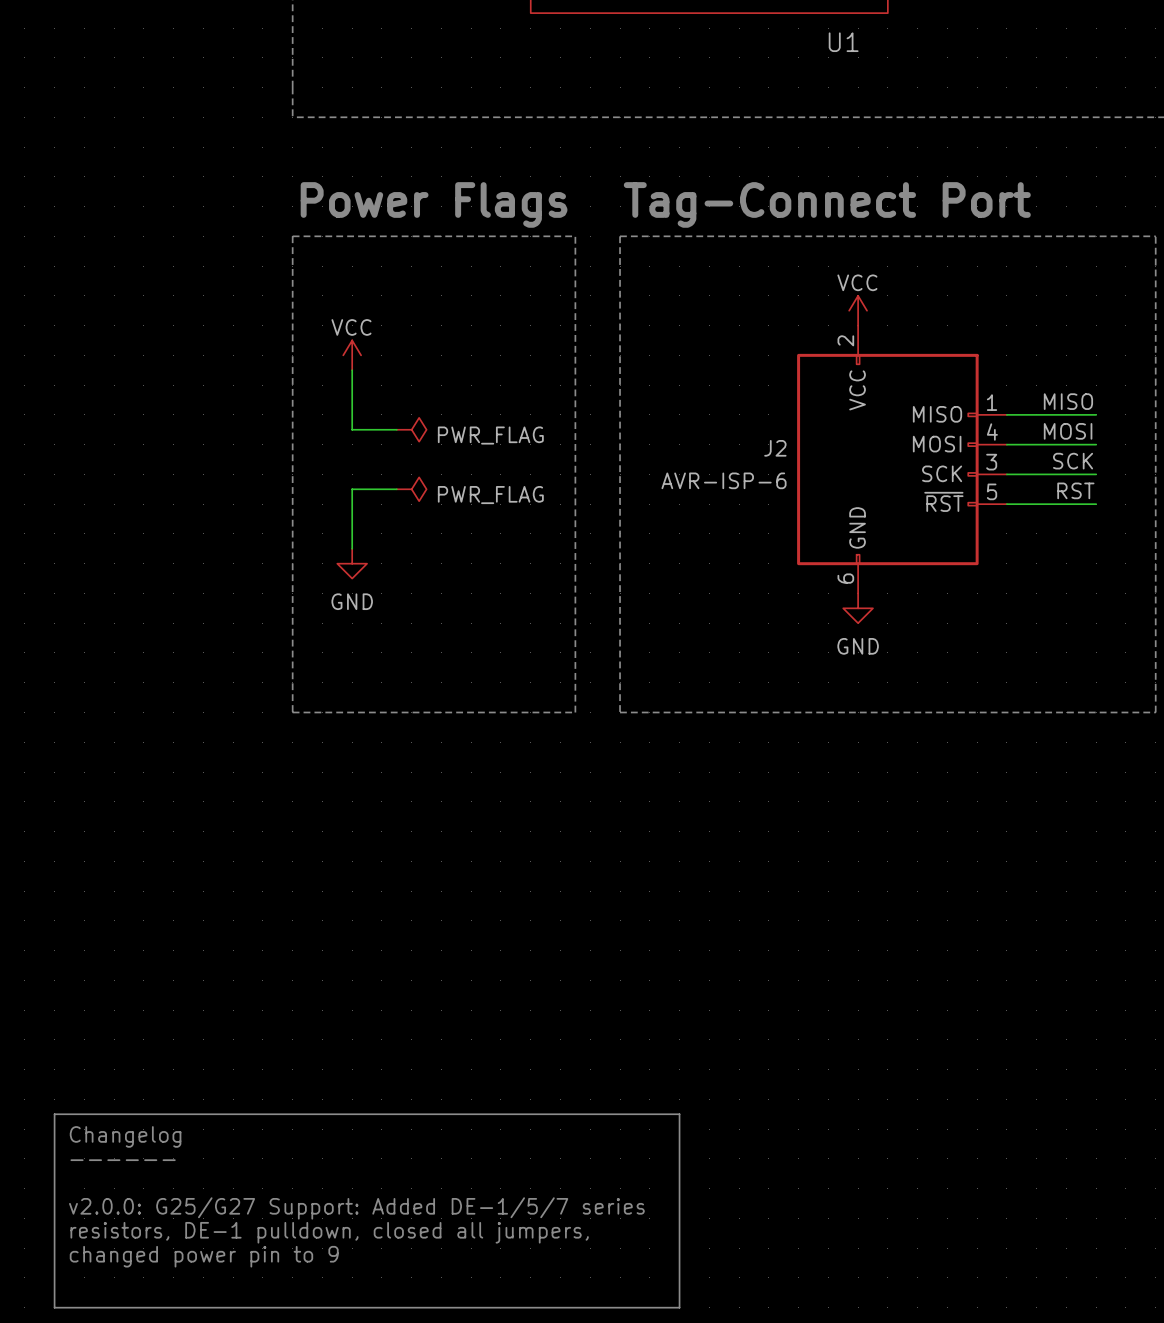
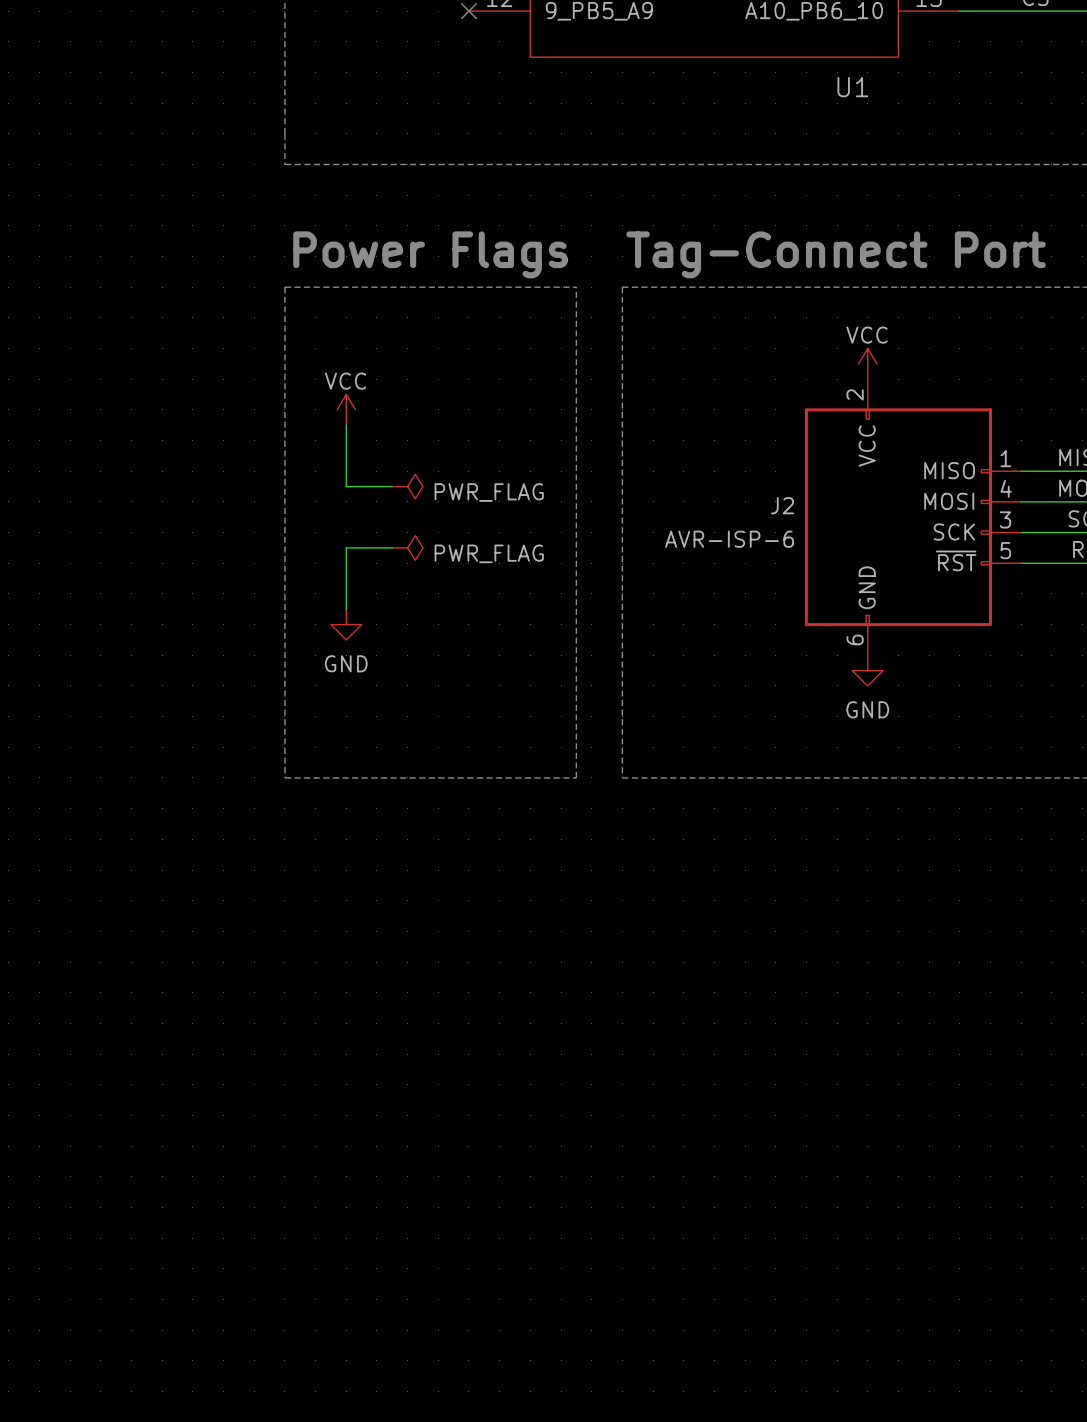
line: (54, 1114) (679, 1114) (679, 1307) (54, 1307) (54, 1114) -> none
text: Changelog (125, 1136) -> none
text: ------ (123, 1160) -> none
text: v2.0.0: G25/G27 Support: Added DE-1/5/7 series (356, 1208) -> none
text: resistors, DE-1 pulldown, closed all jumpers, (329, 1232) -> none
text: changed power pin to 9 (204, 1256) -> none

